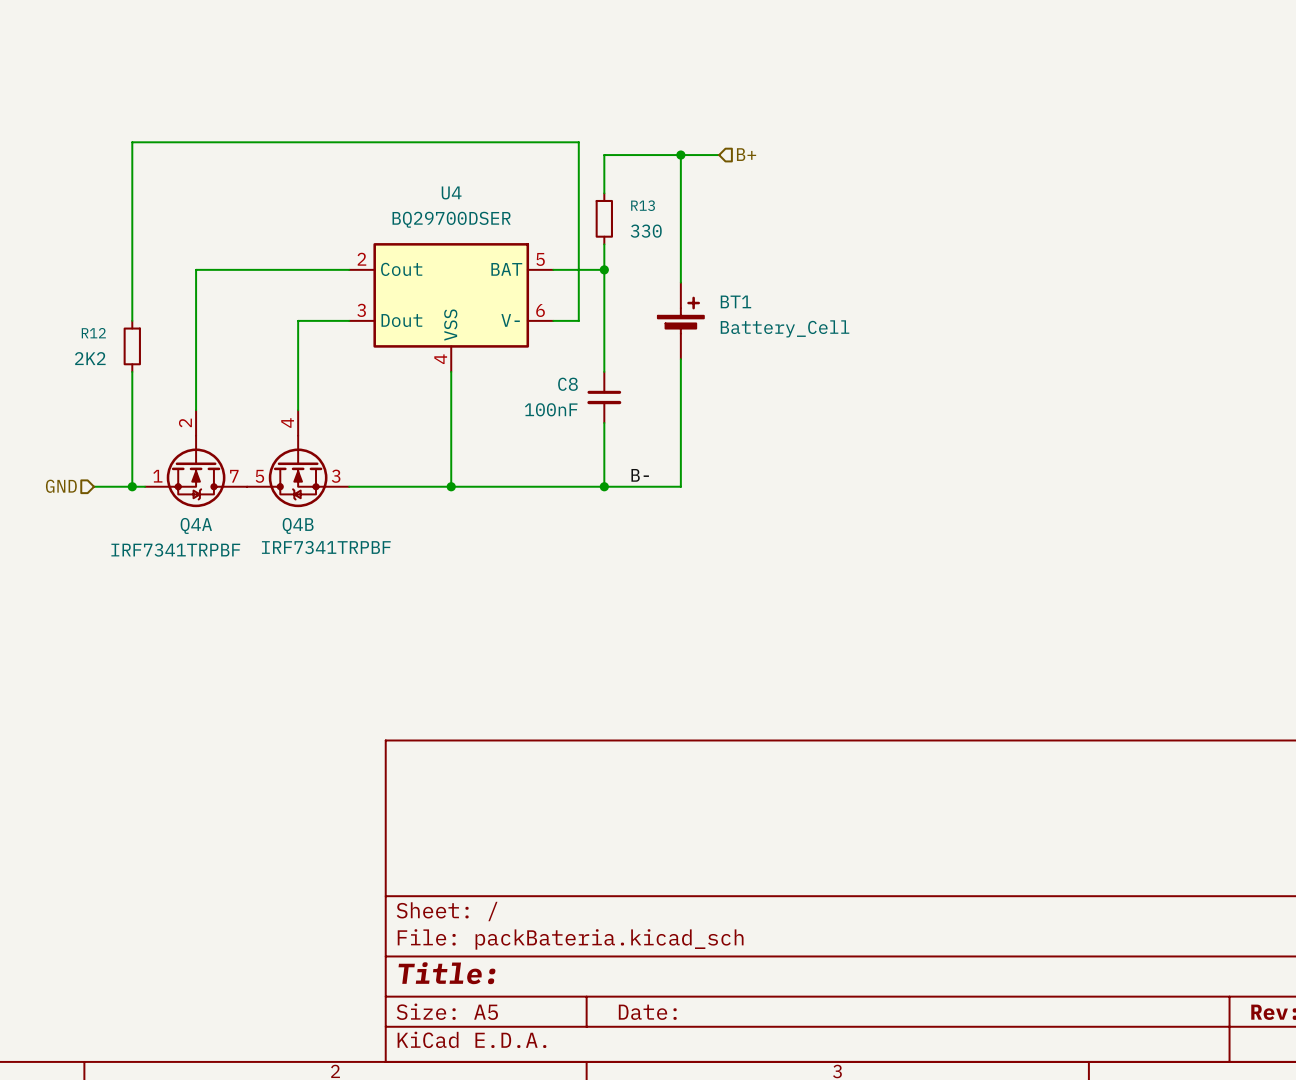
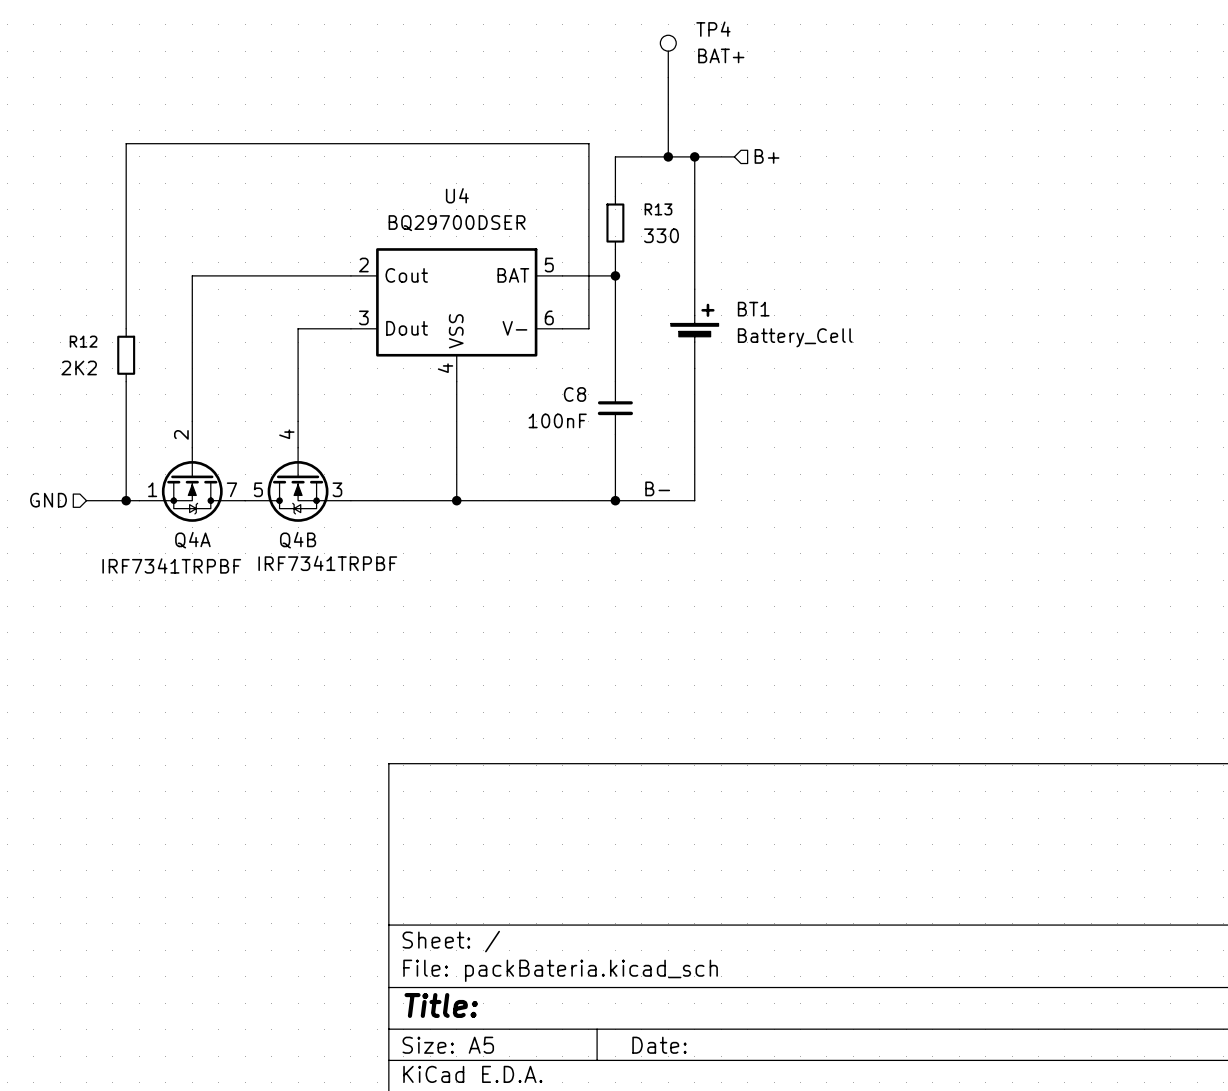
TP4: none -> BAT+ (668, 56)
wire: none -> (668, 77) (668, 156)
junction: none -> (668, 156)

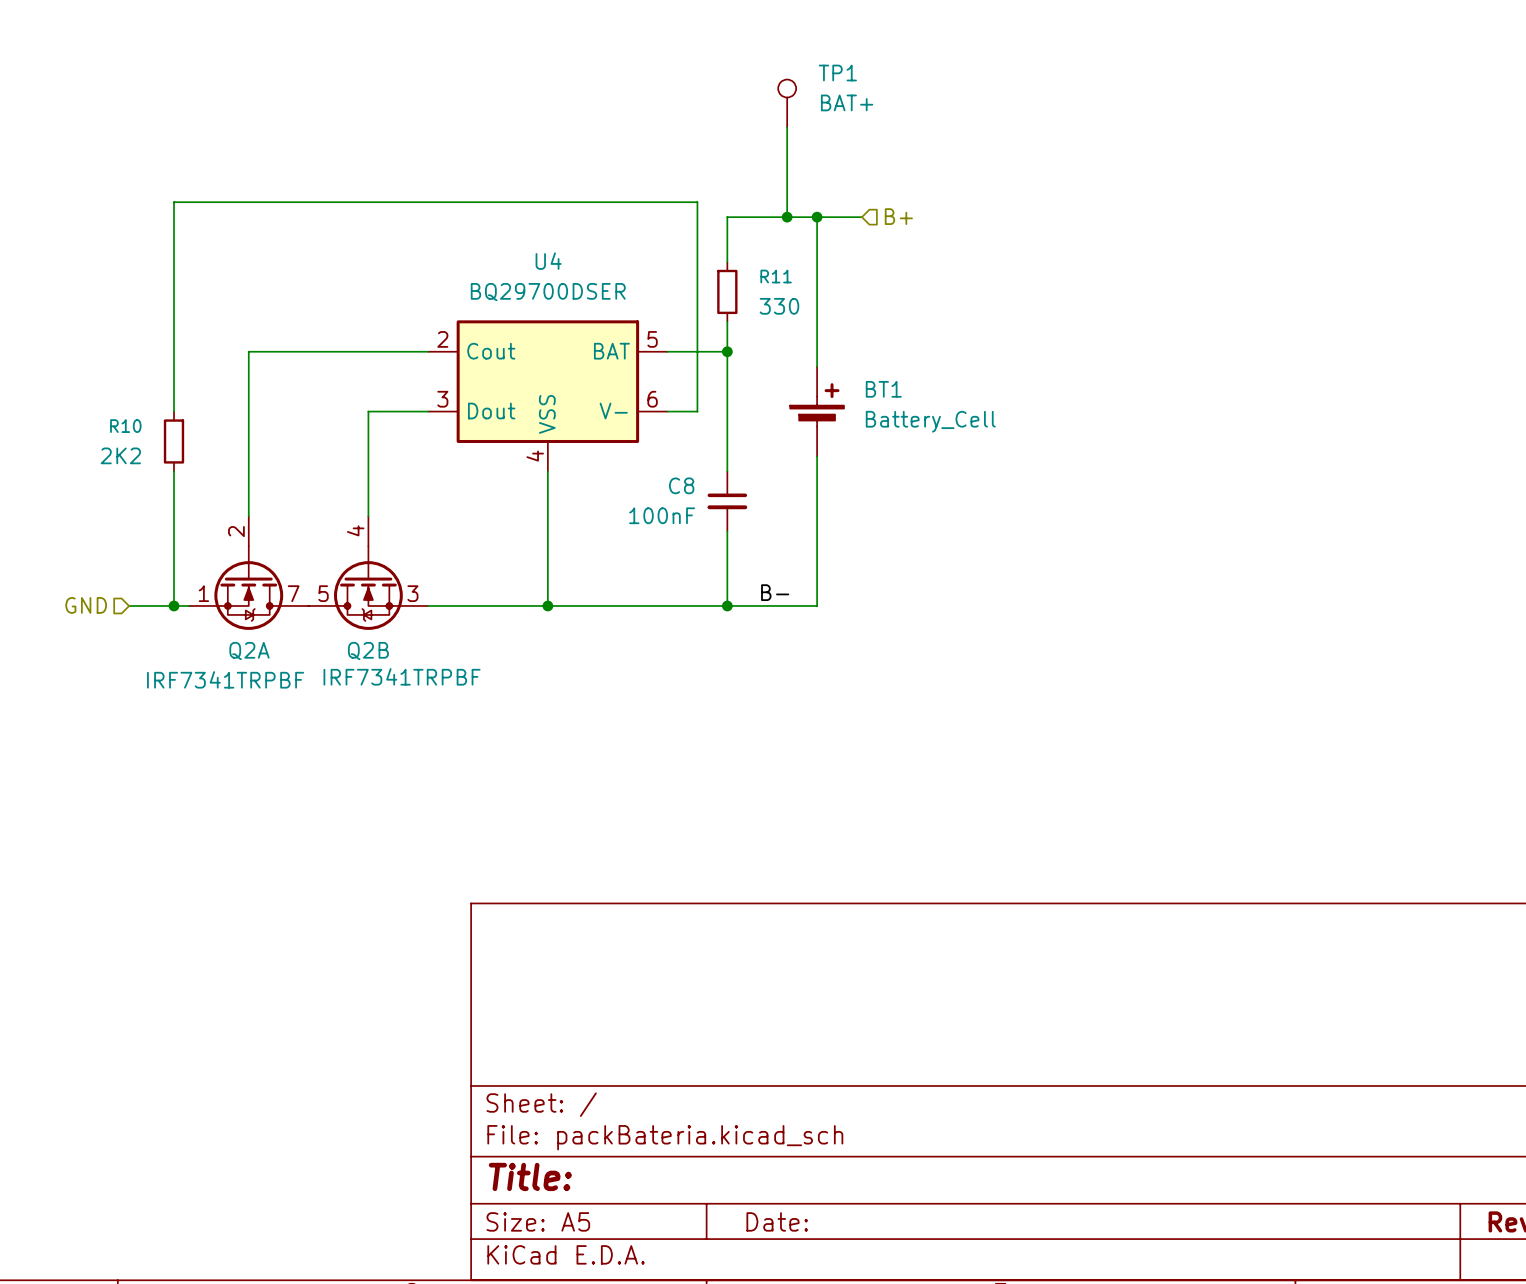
TP4 name: TP4 (713, 29) -> TP1 (837, 73)
R13 name: R13 (658, 209) -> R11 (776, 276)
R12 name: R12 (83, 341) -> R10 (125, 426)
Q4A name: Q4A (192, 540) -> Q2A (249, 651)
Q4B name: Q4B (298, 540) -> Q2B (368, 651)

